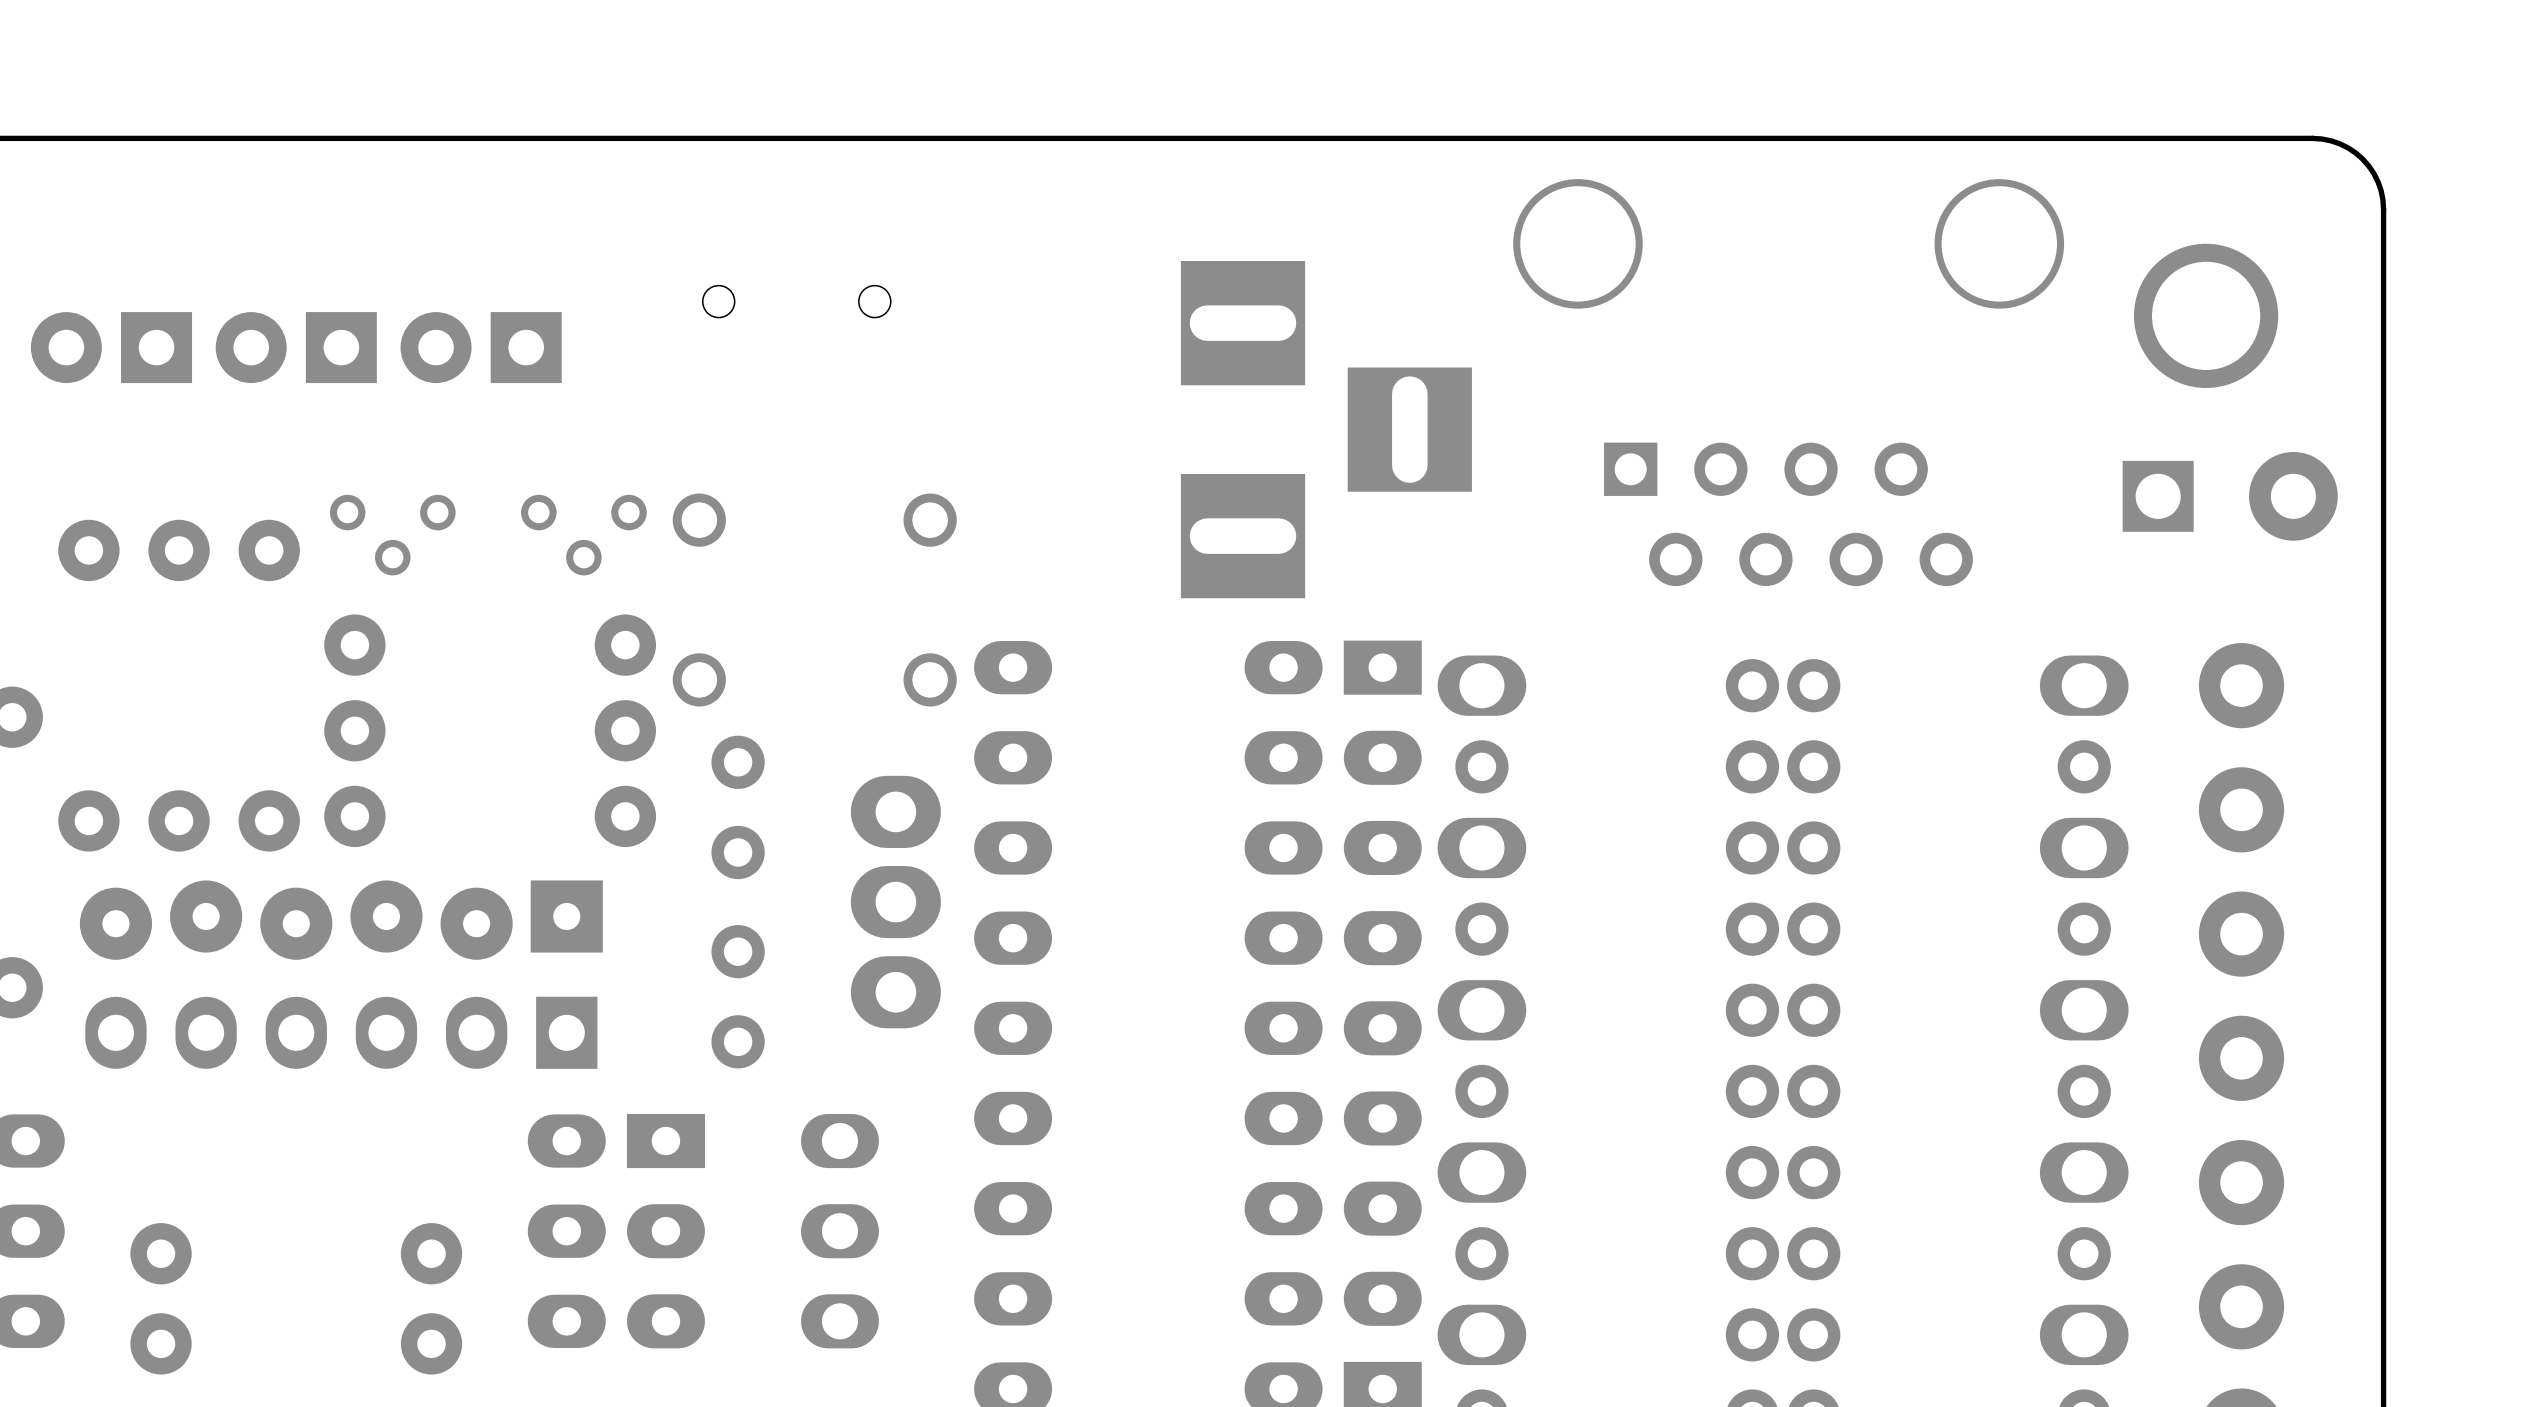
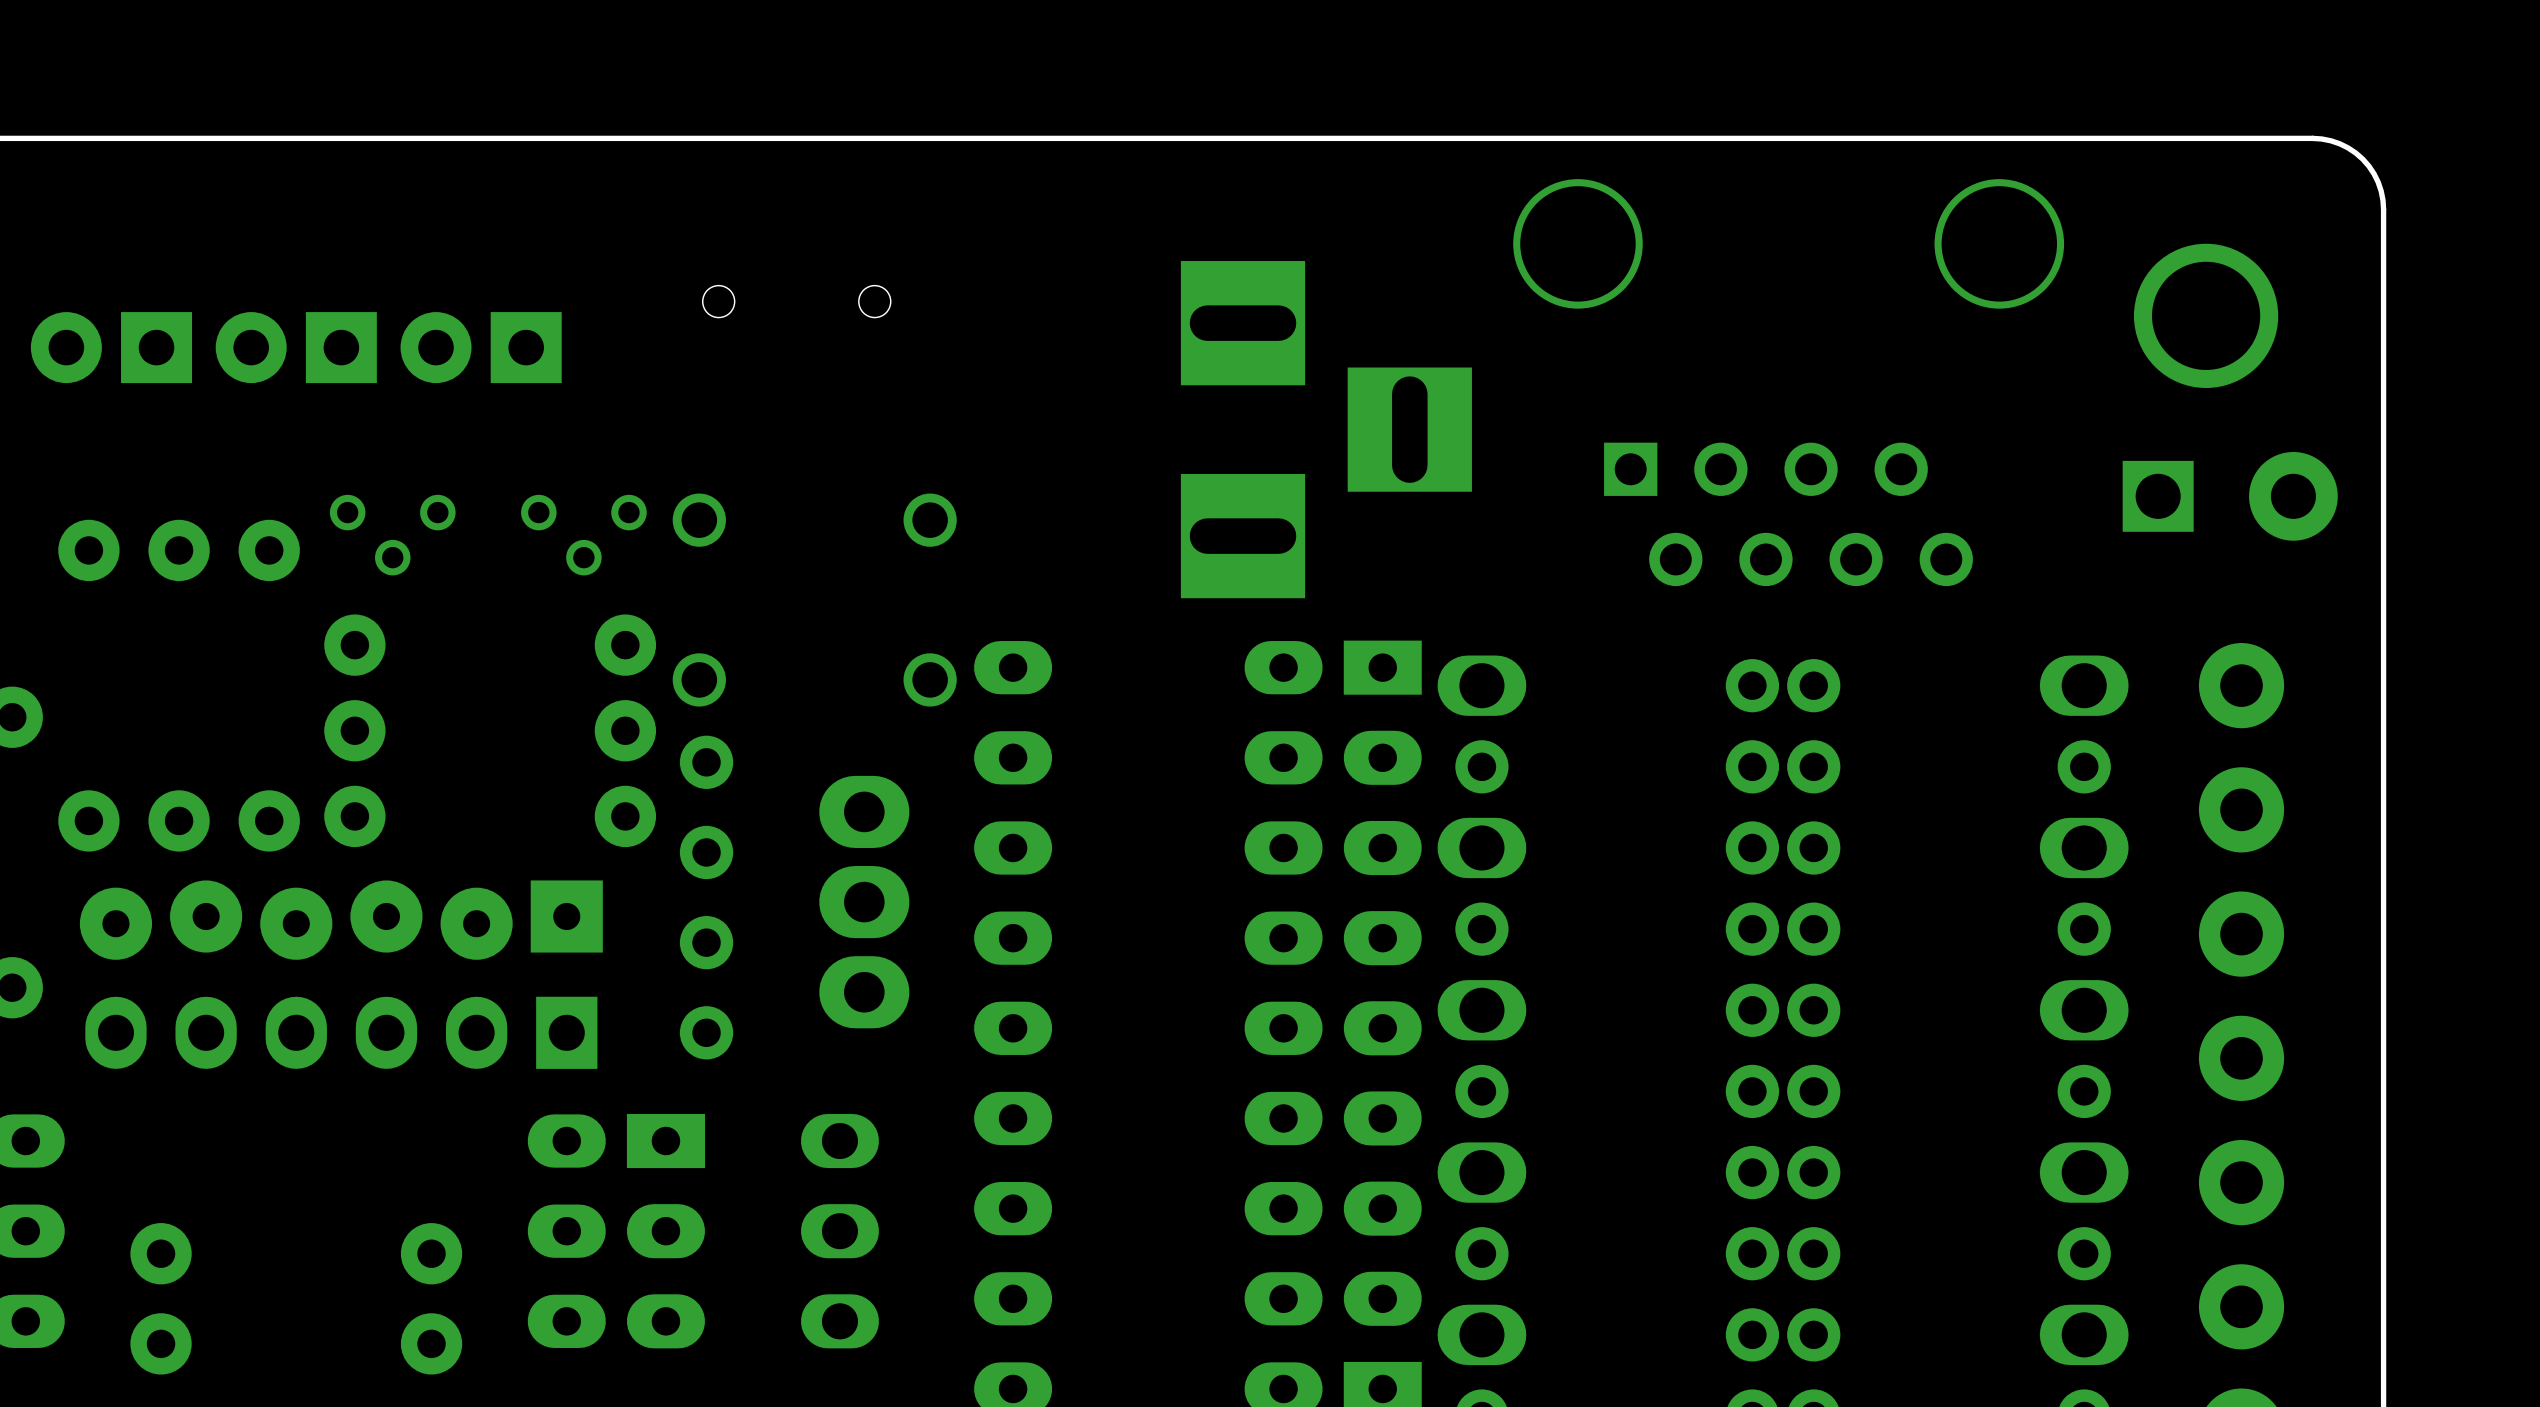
part position: (738, 807) -> (706, 807)
part position: (895, 902) -> (864, 902)
part position: (738, 996) -> (706, 987)

